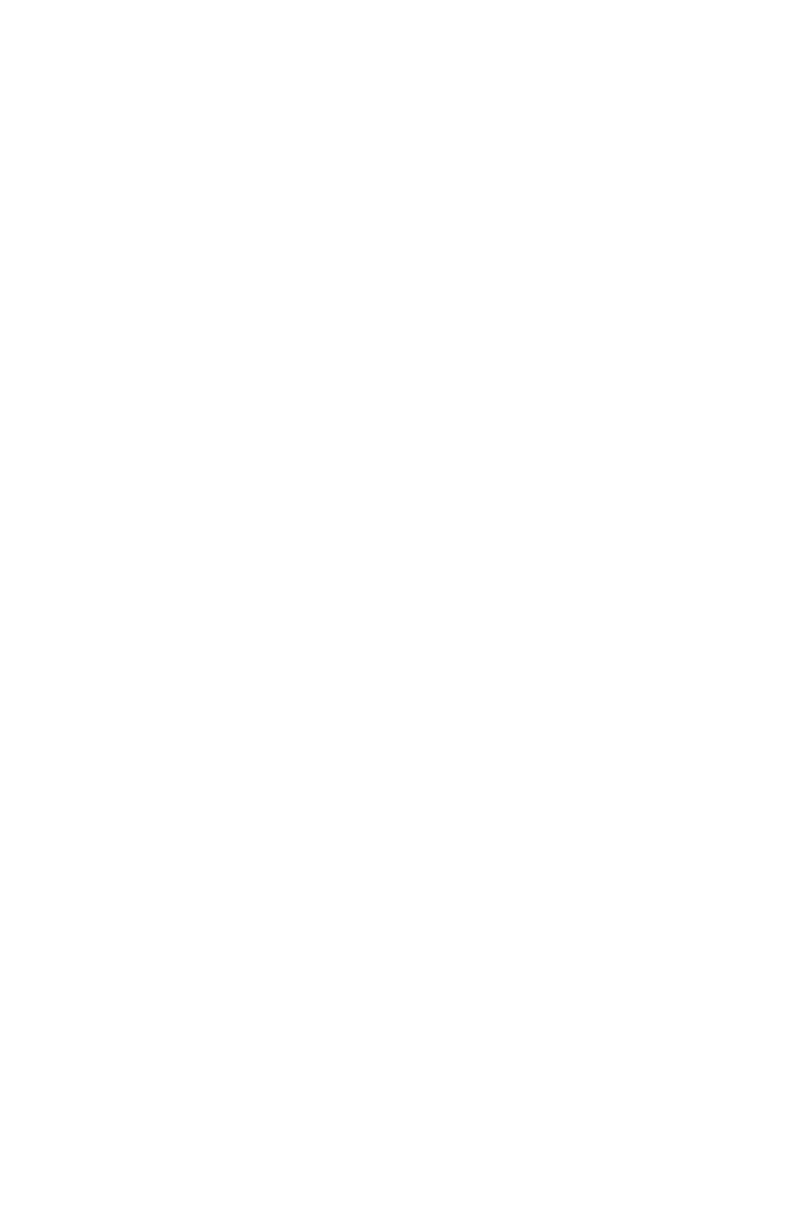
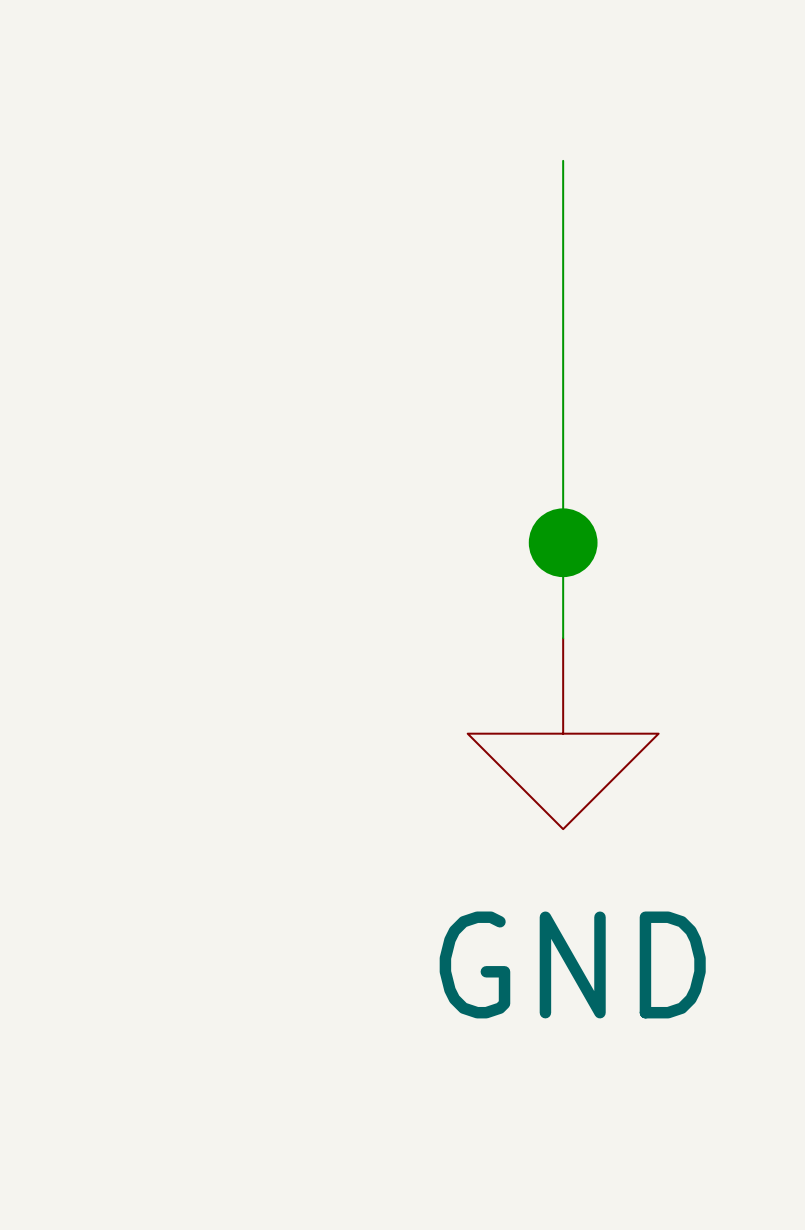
wire: none -> (563, 160) (563, 638)
junction: none -> (563, 542)
power symbol: none -> GND (563, 733)

